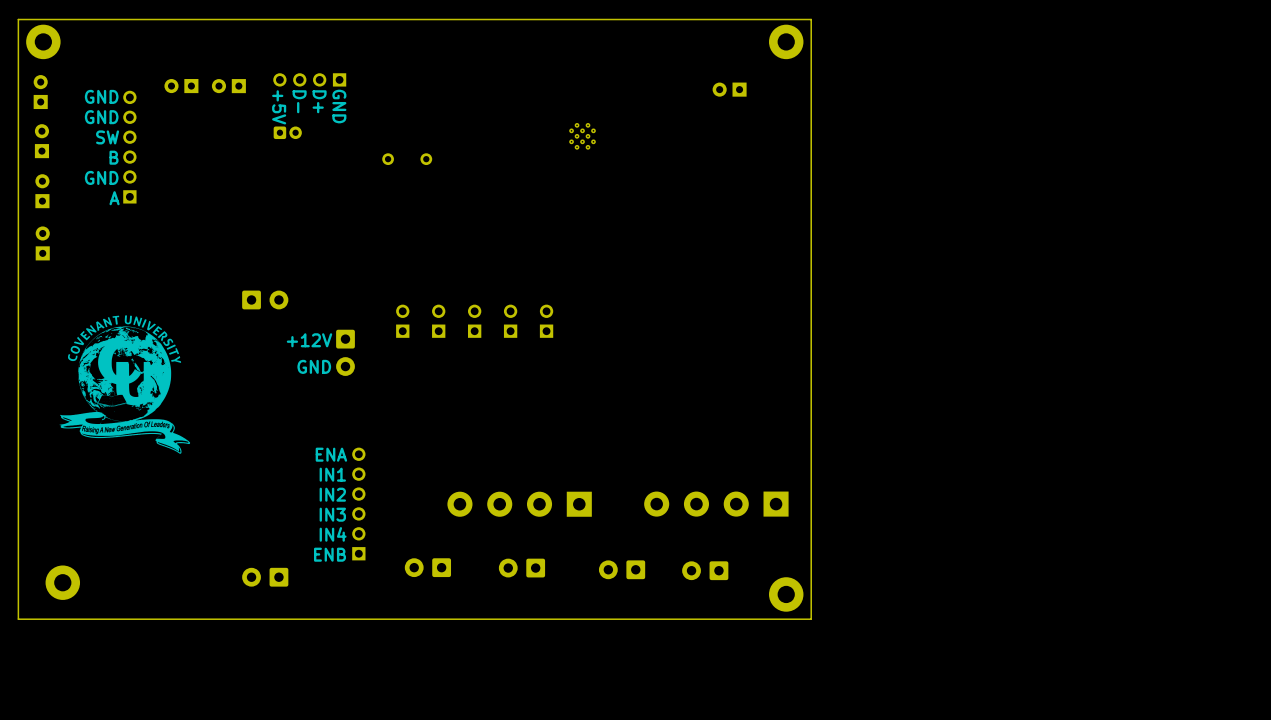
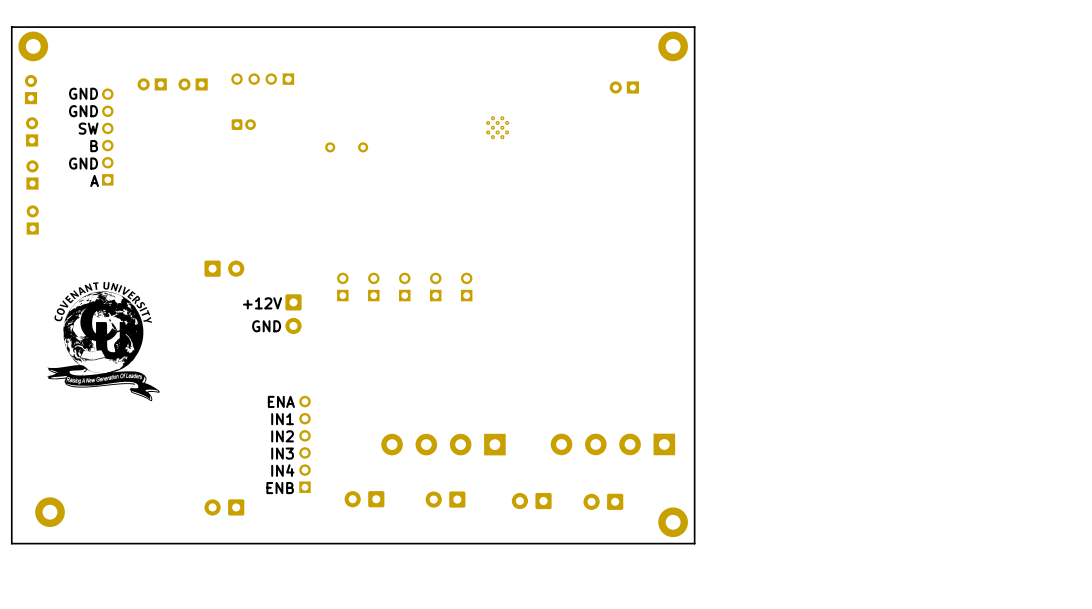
text: D- (299, 101) -> none
text: D+ (319, 101) -> none
text: GND (339, 106) -> none
text: +5V (279, 107) -> none

